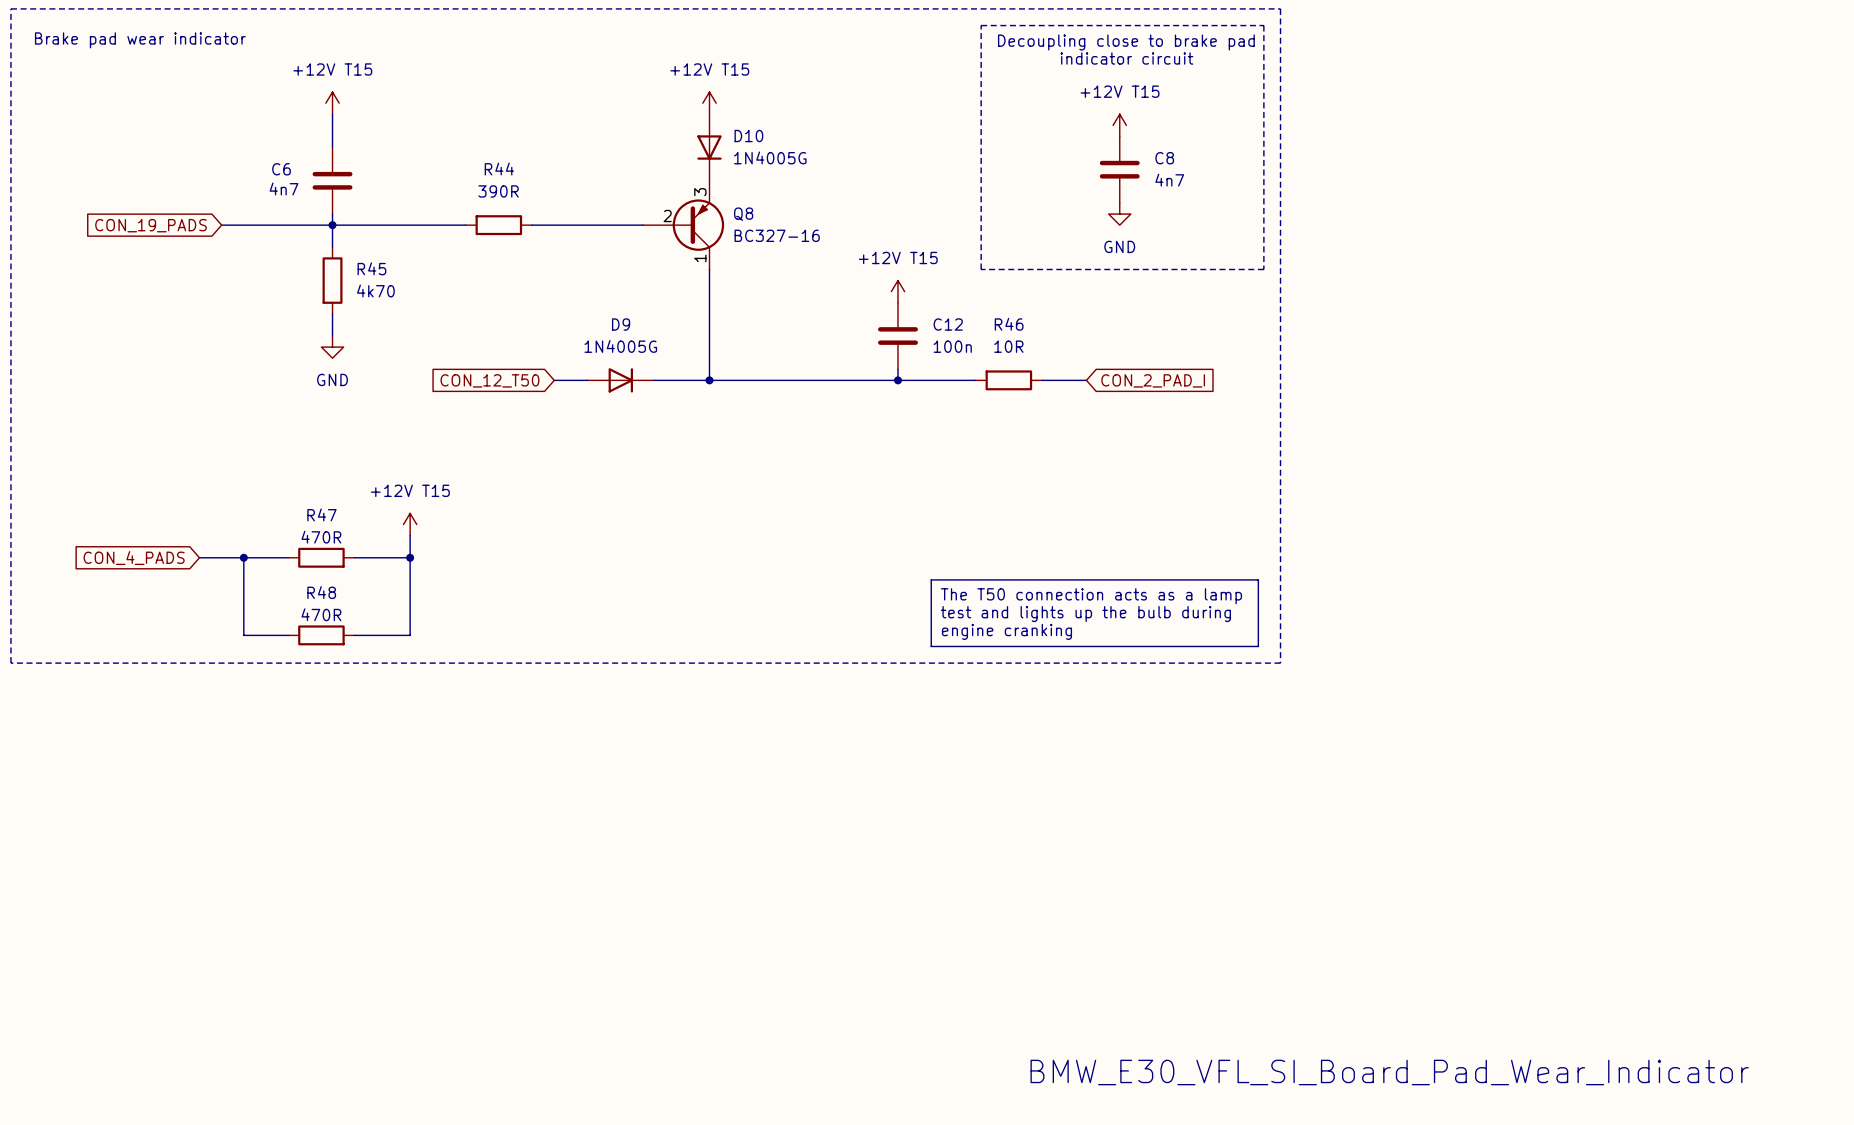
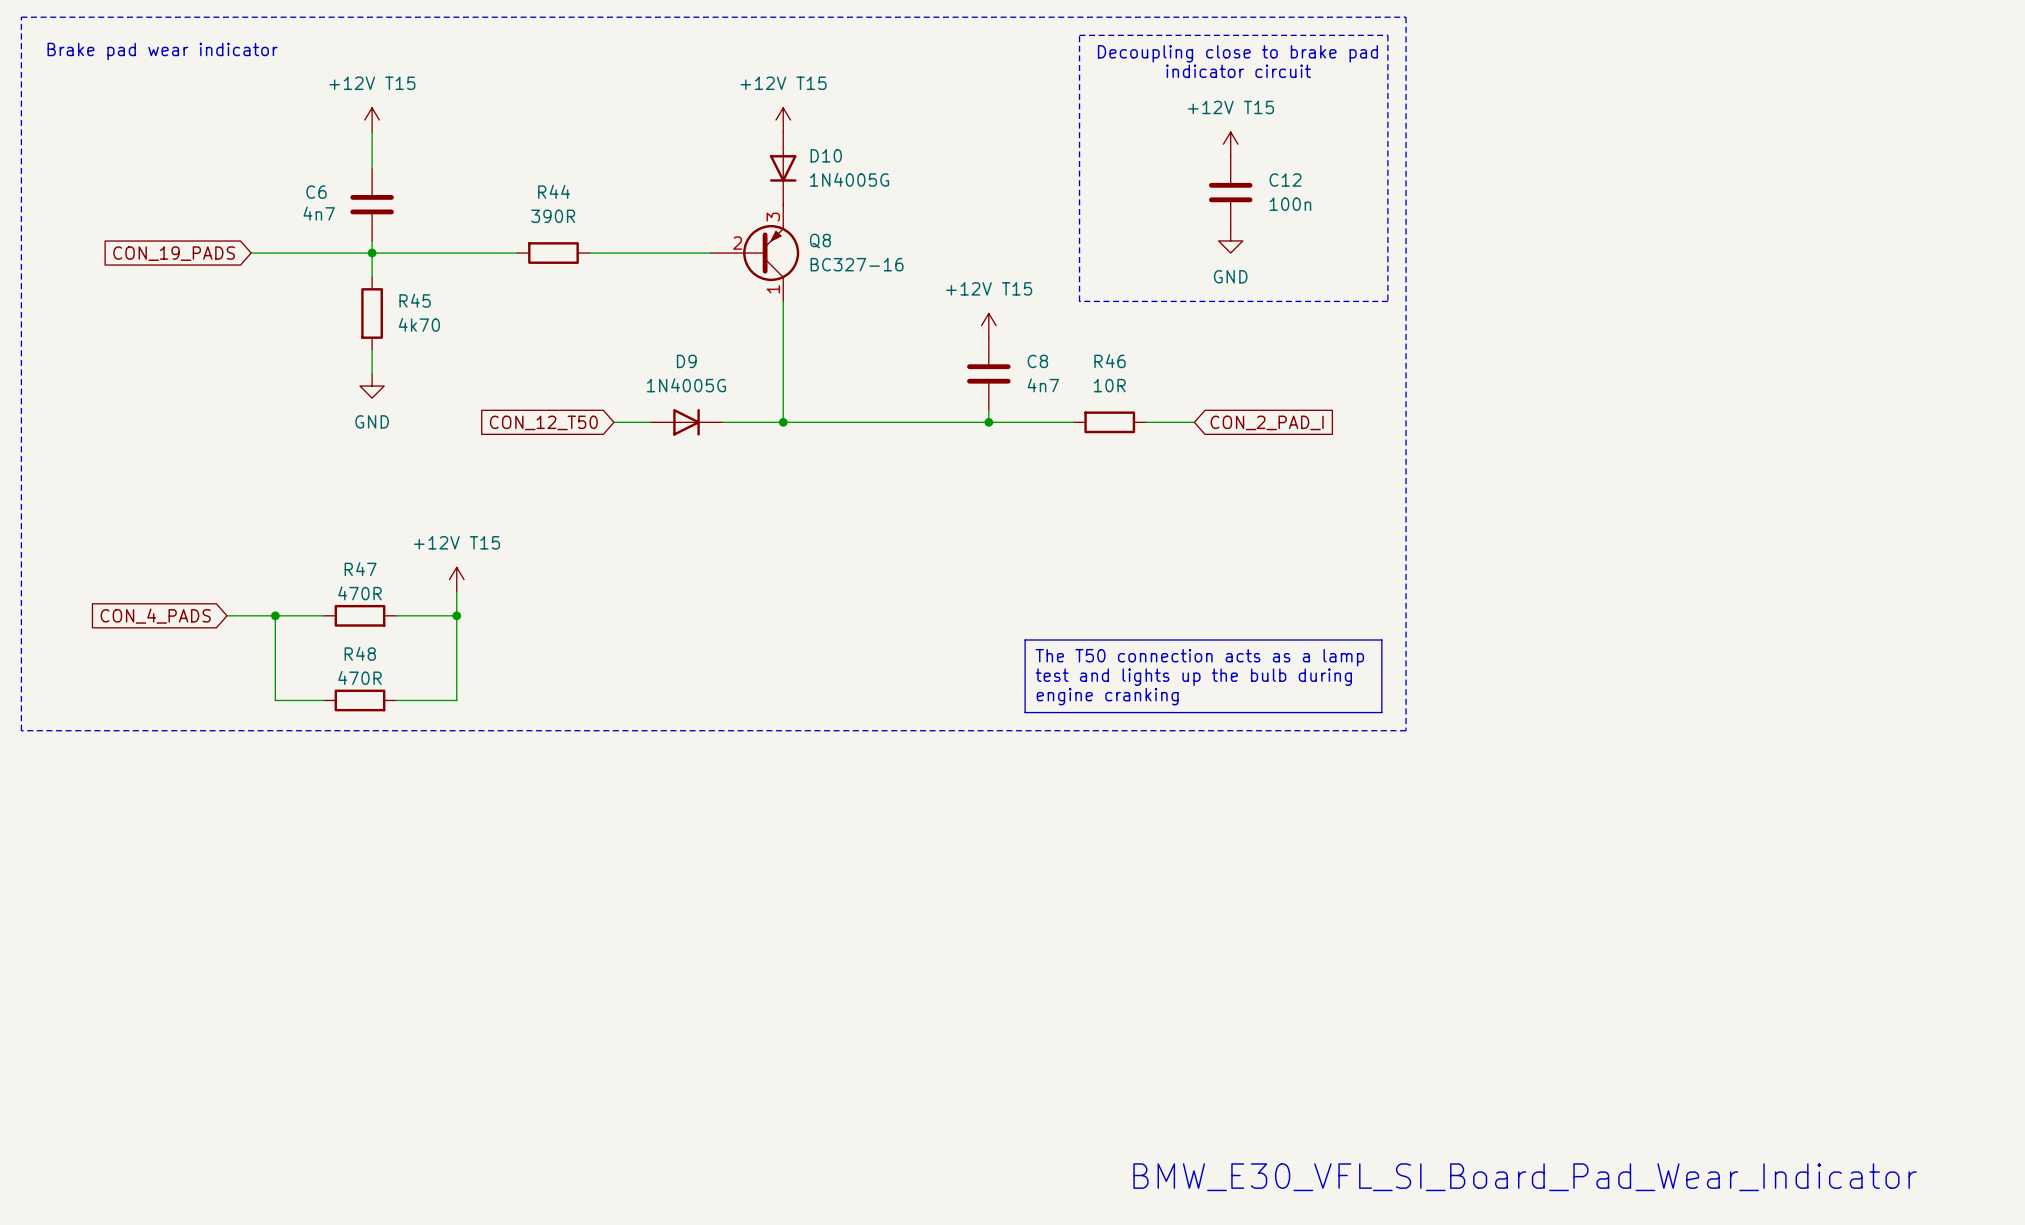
C8 name: C8 (1164, 158) -> C12 (1285, 180)
C8 value: 4n7 (1169, 180) -> 100n (1290, 204)
C12 name: C12 (948, 324) -> C8 (1037, 361)
C12 value: 100n (952, 346) -> 4n7 (1043, 385)

